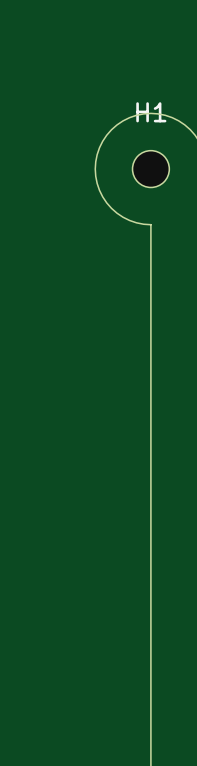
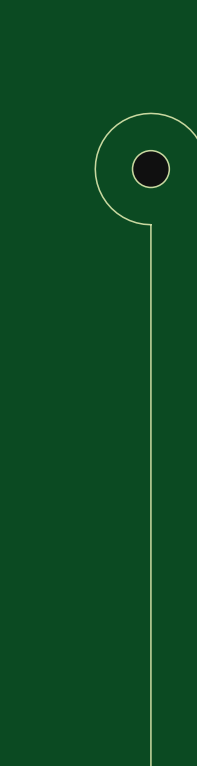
H1 name: H1 (151, 112) -> none

